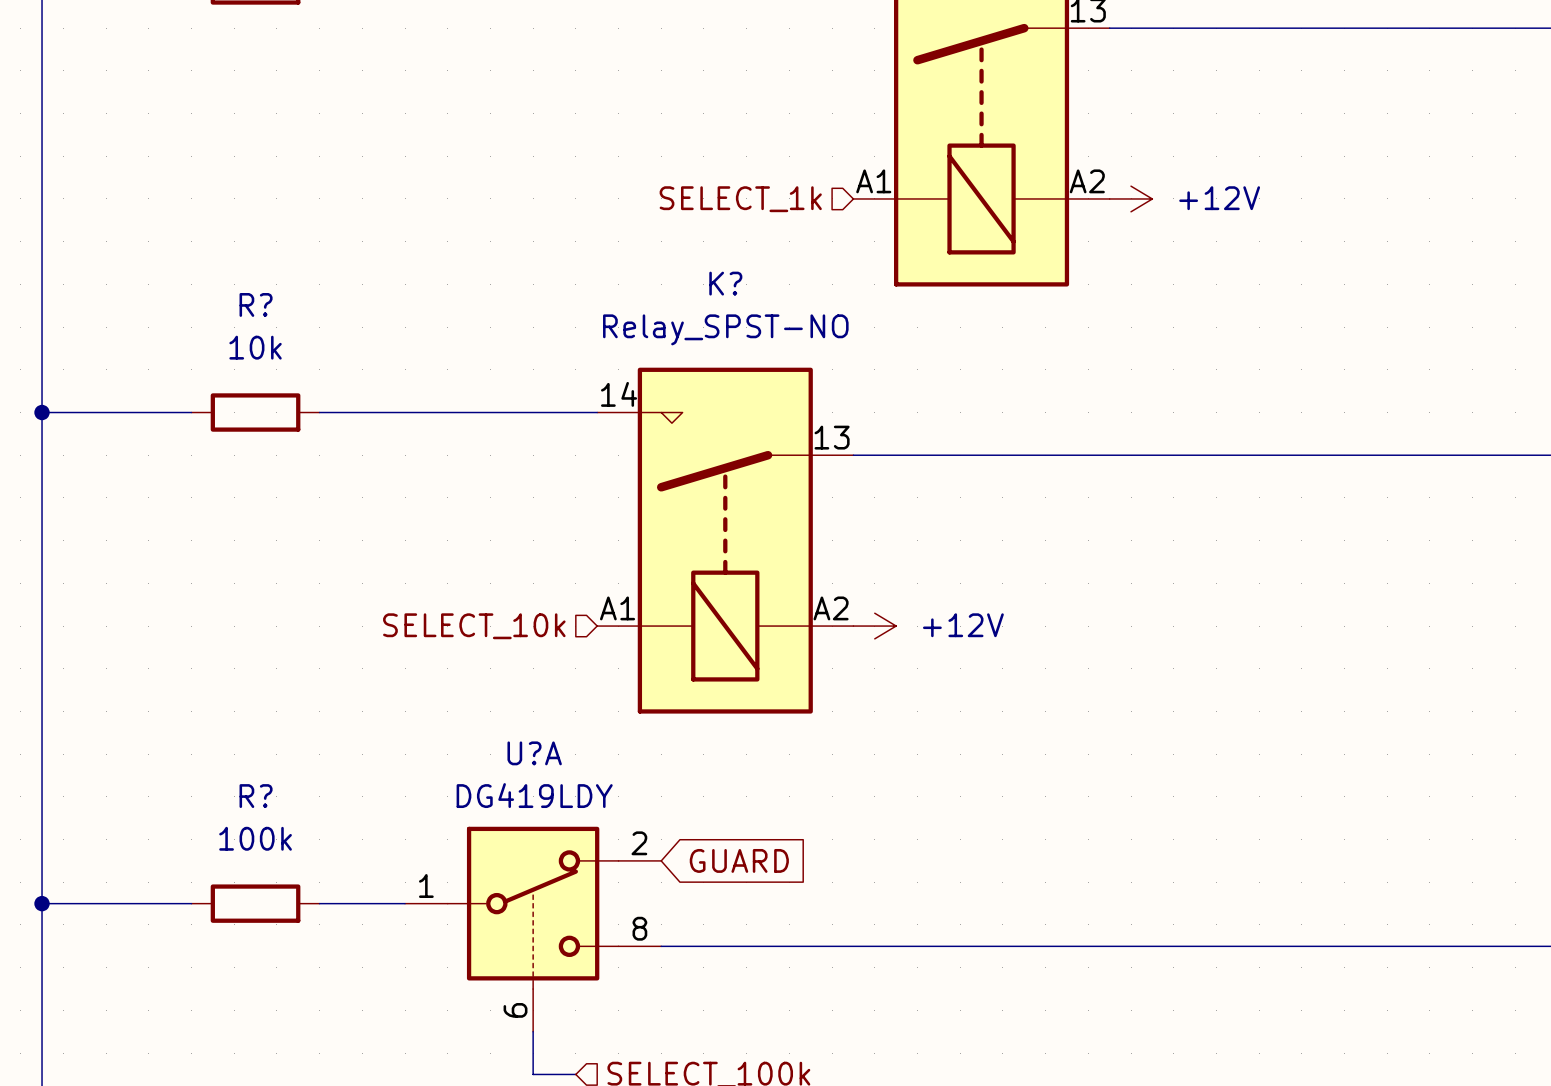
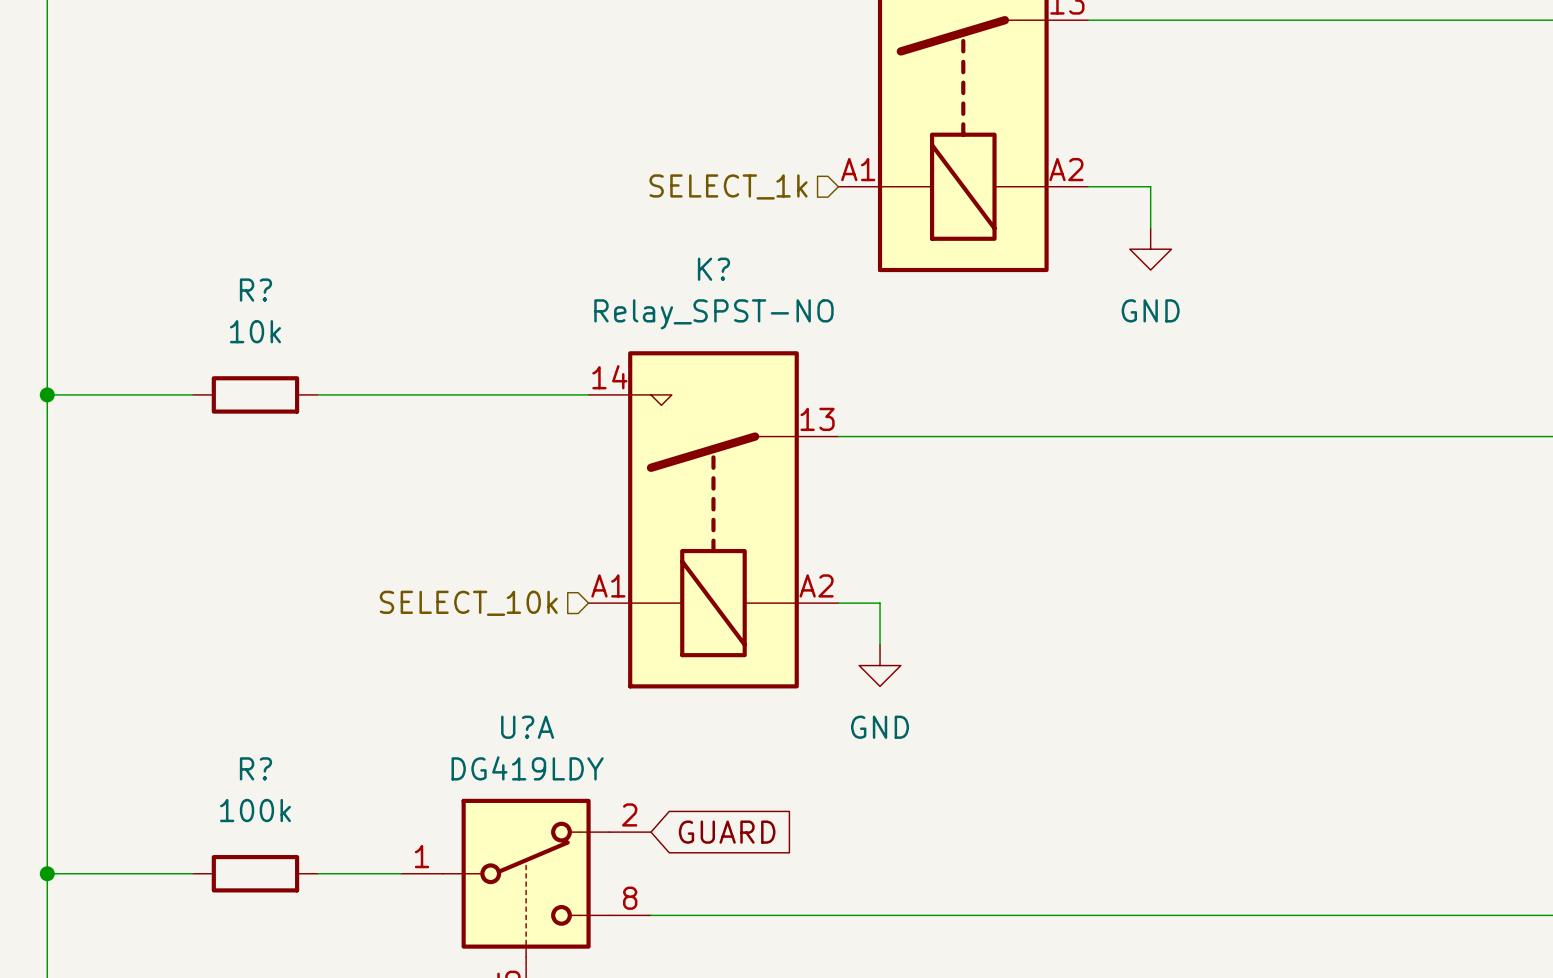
wire: none -> (1088, 186) (1150, 186) (1150, 228)
power symbol: +12V (1131, 198) -> none
power symbol: none -> GND (1150, 249)
wire: none -> (838, 603) (880, 603) (880, 644)
power symbol: +12V (874, 626) -> none
power symbol: none -> GND (880, 665)

